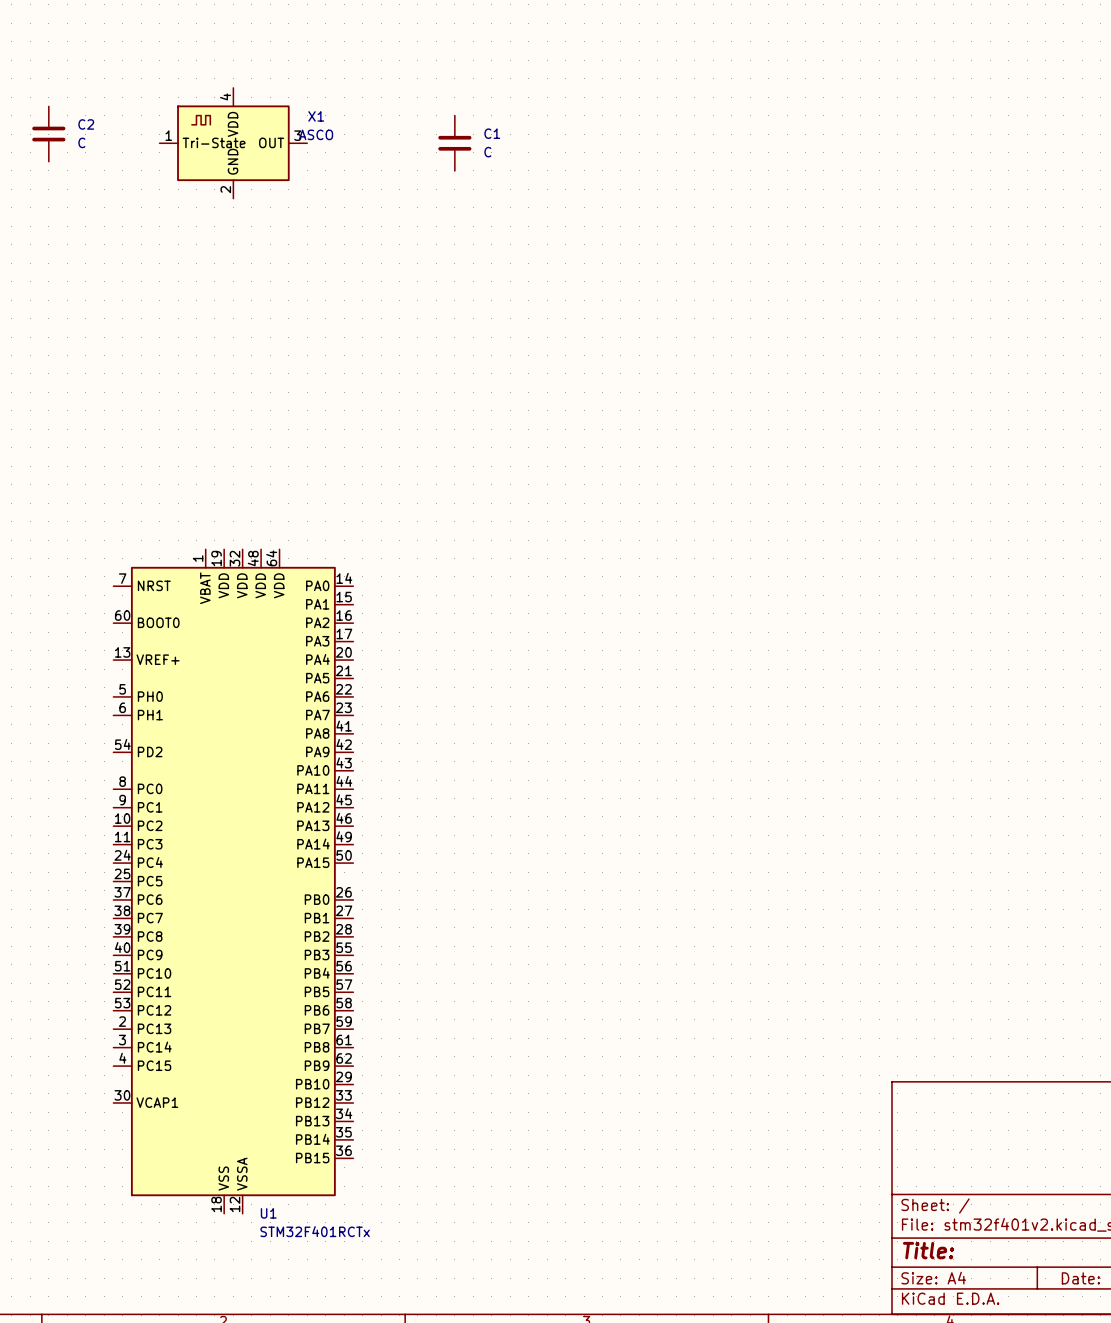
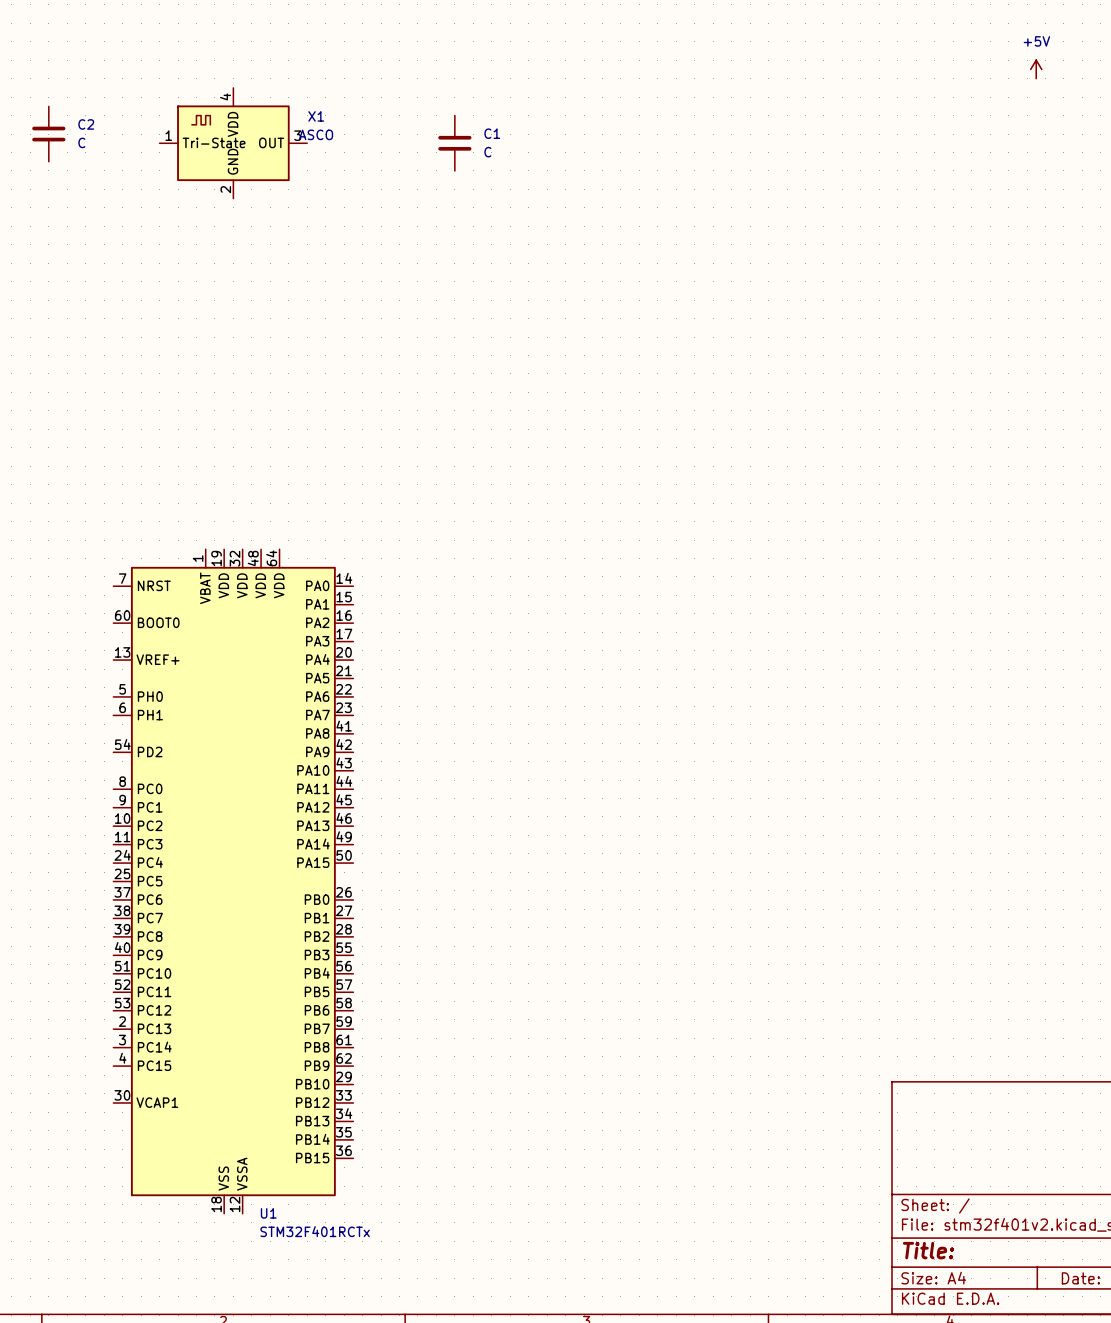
power symbol: none -> +5V (1036, 69)

